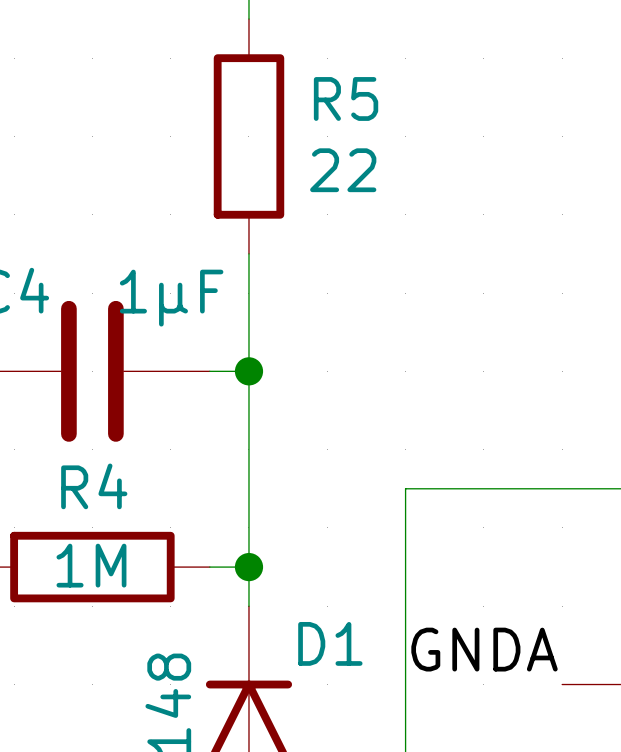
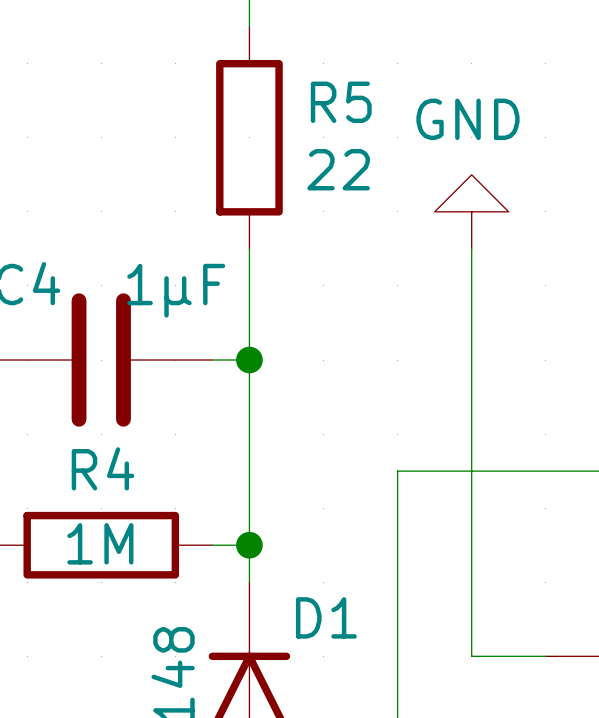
power symbol: none -> GND (471, 211)
wire: none -> (471, 248) (471, 656) (545, 656)
label: GNDA (484, 649) -> none

